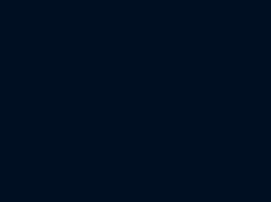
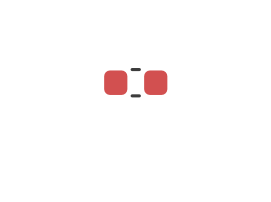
part: none -> (135, 82)

